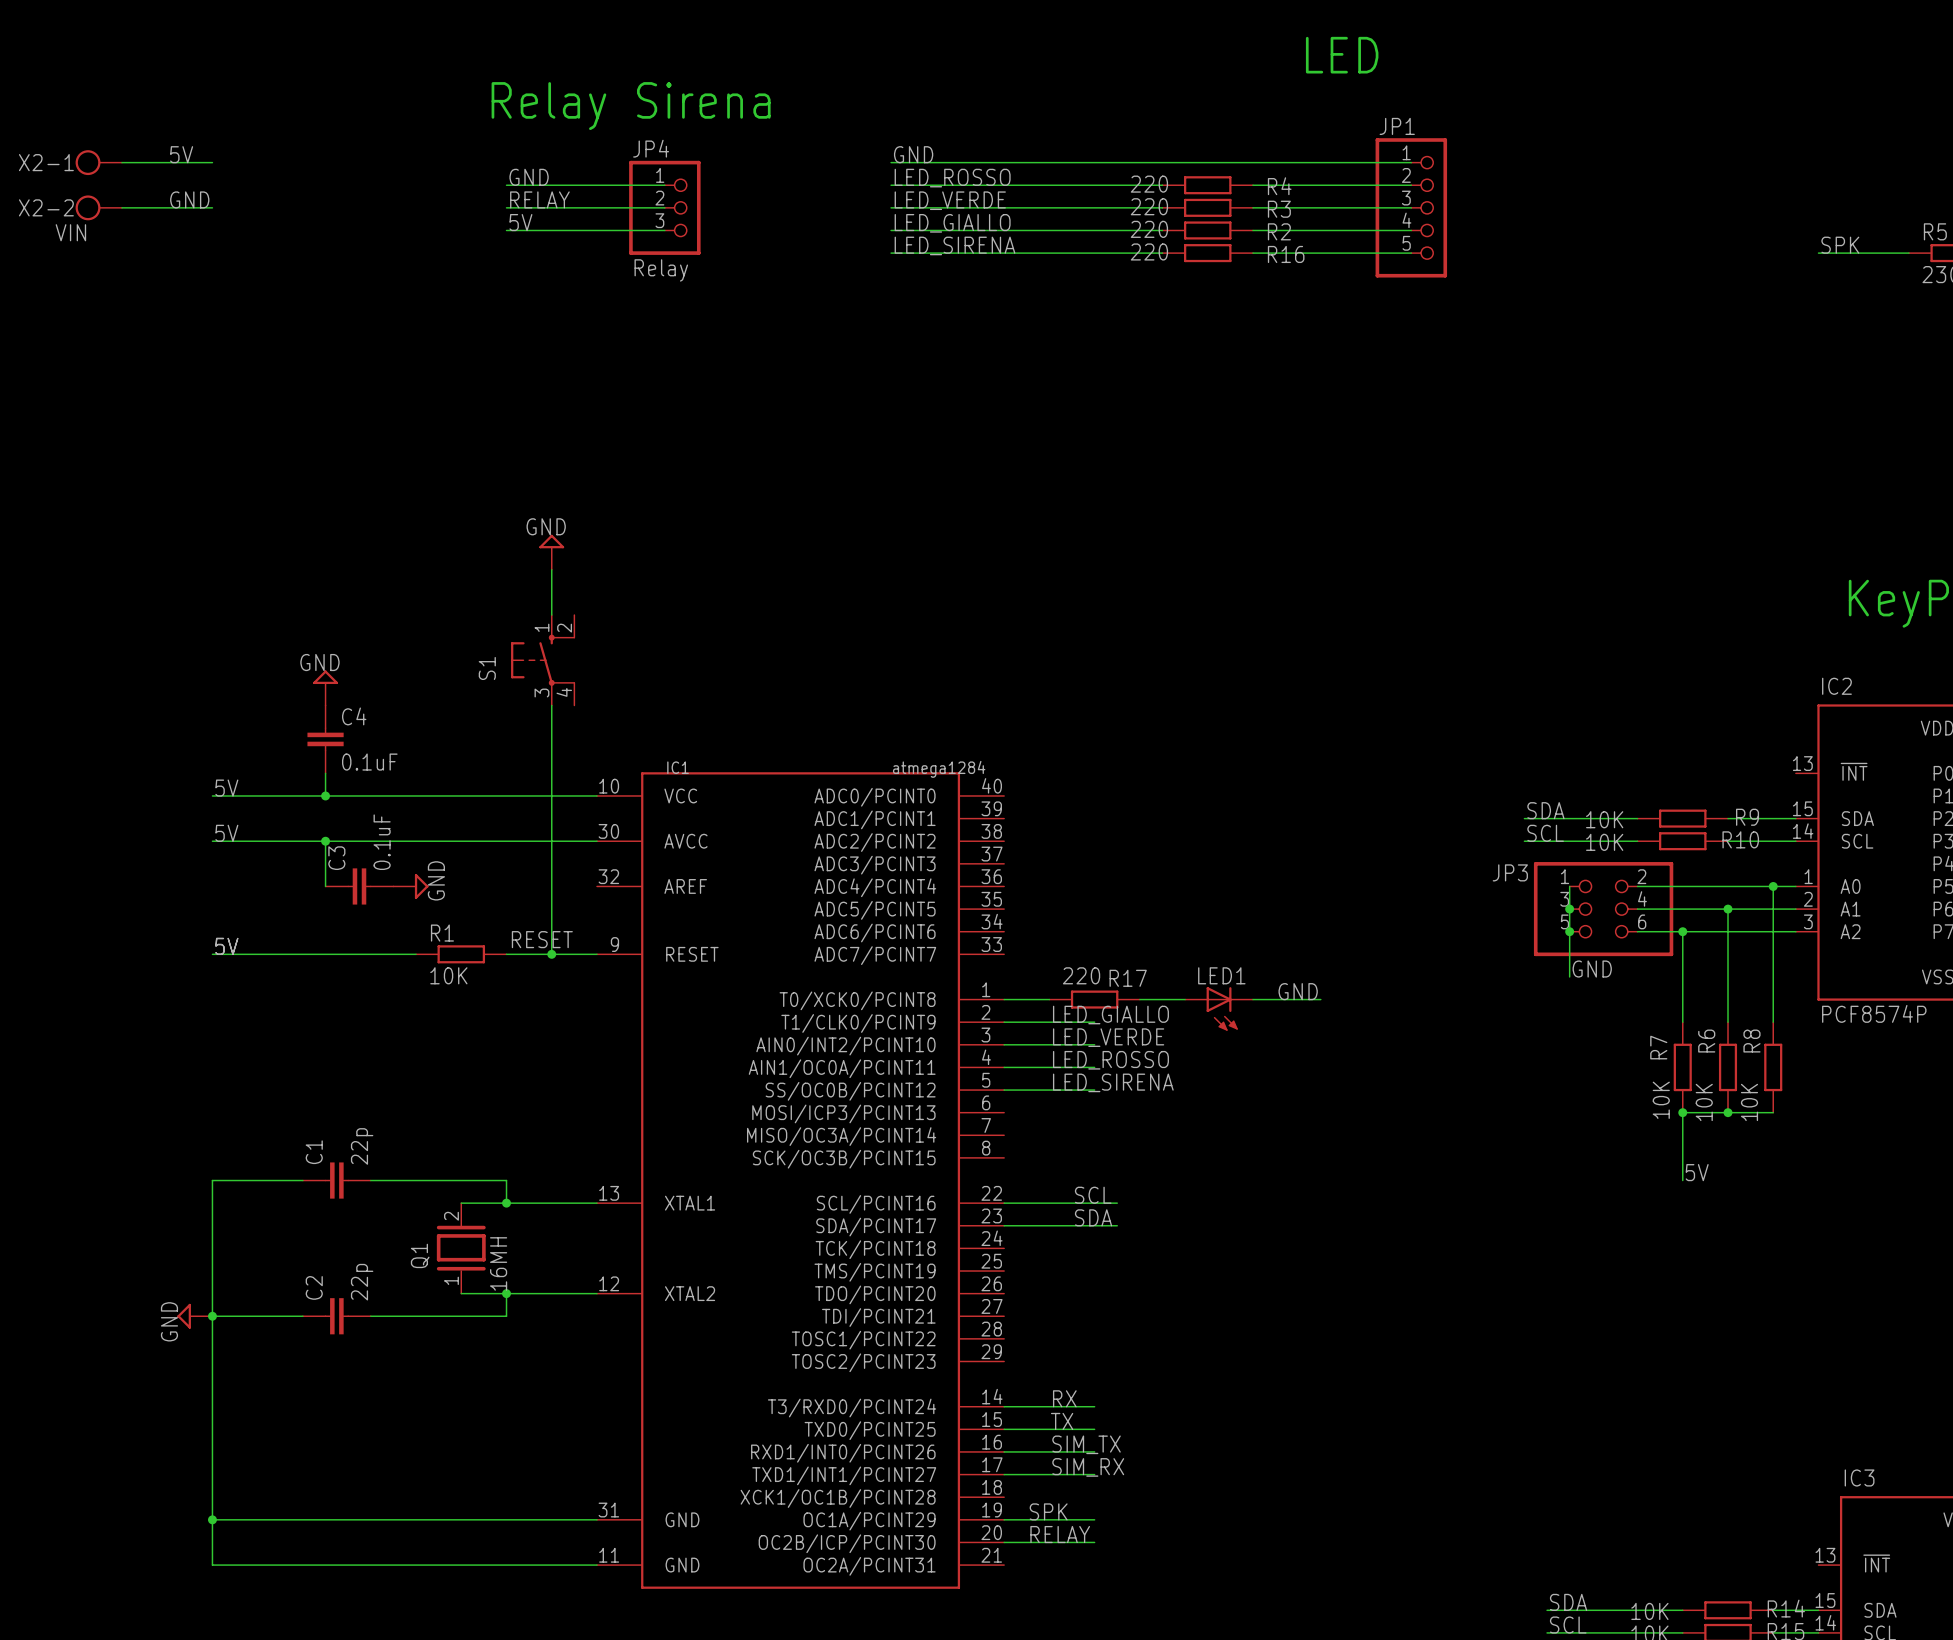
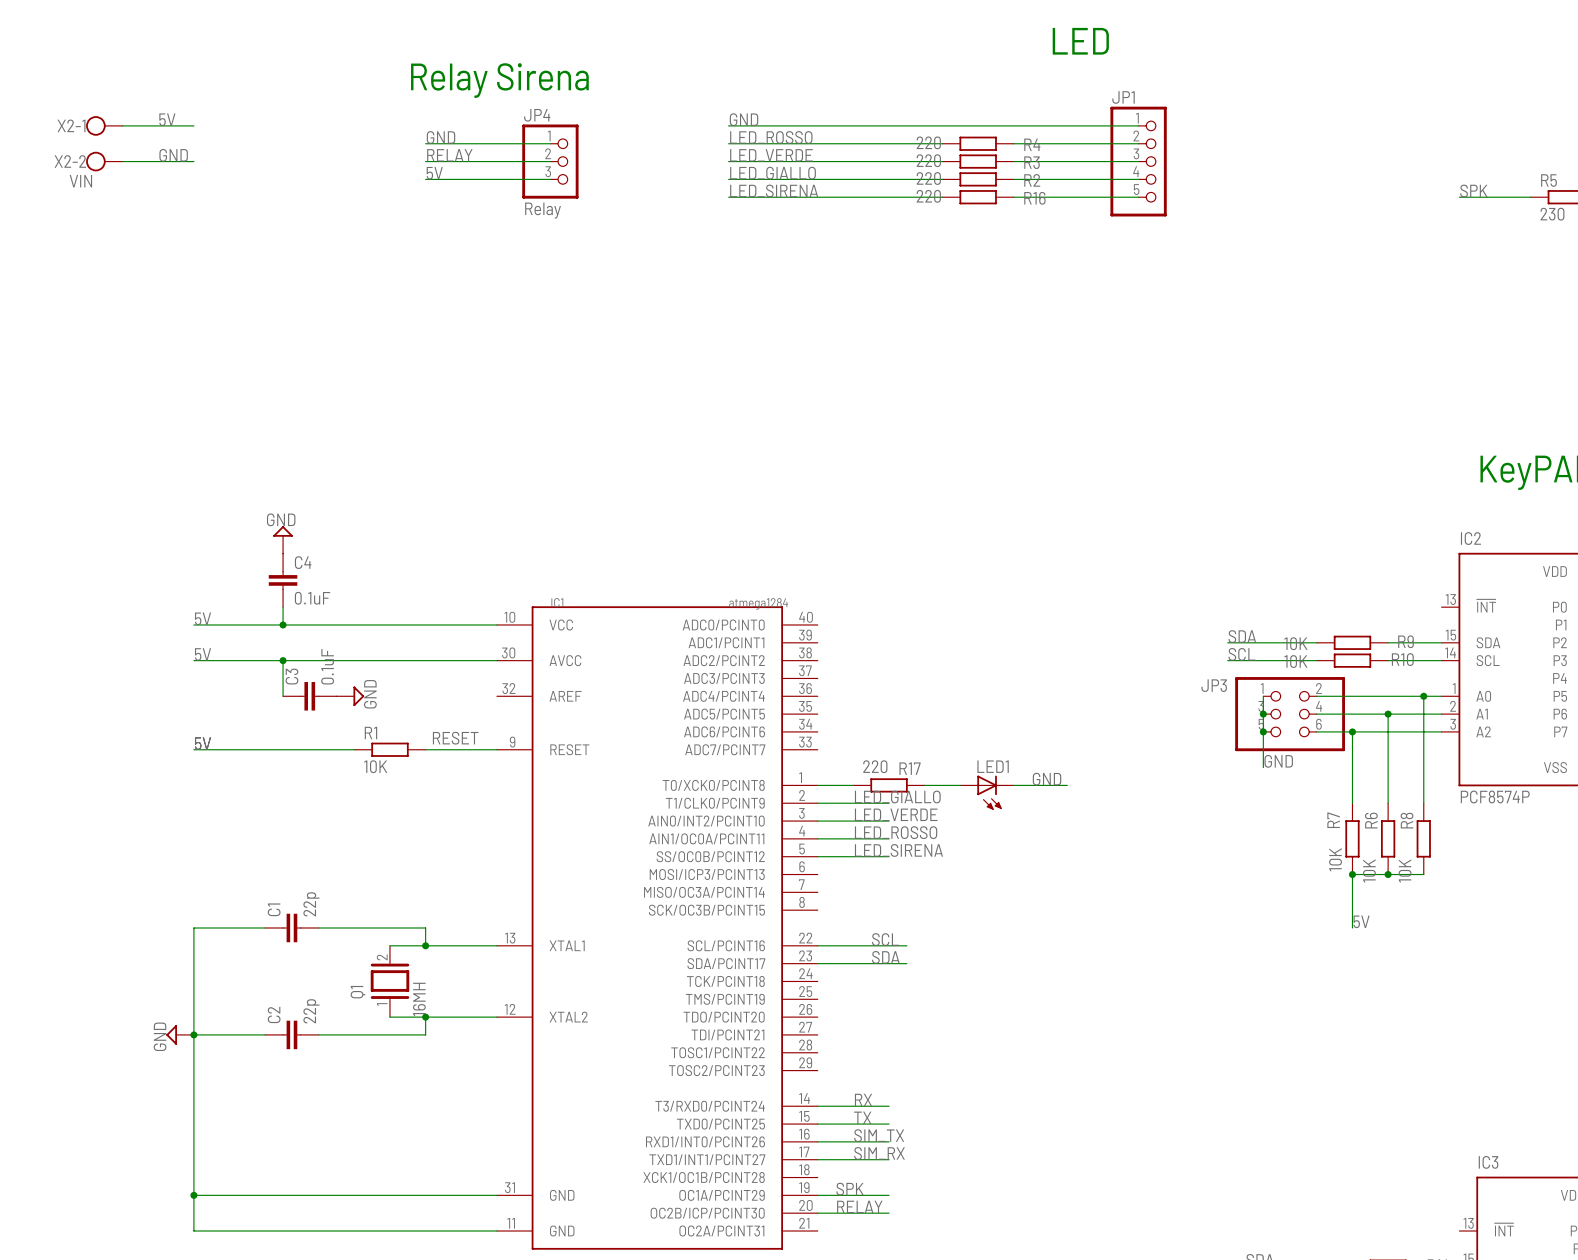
power symbol: GND (551, 552) -> none
wire: (551, 569) (551, 615) -> none
S1: (543, 660) -> none
wire: (551, 705) (551, 954) -> none
junction: (551, 954) -> none

